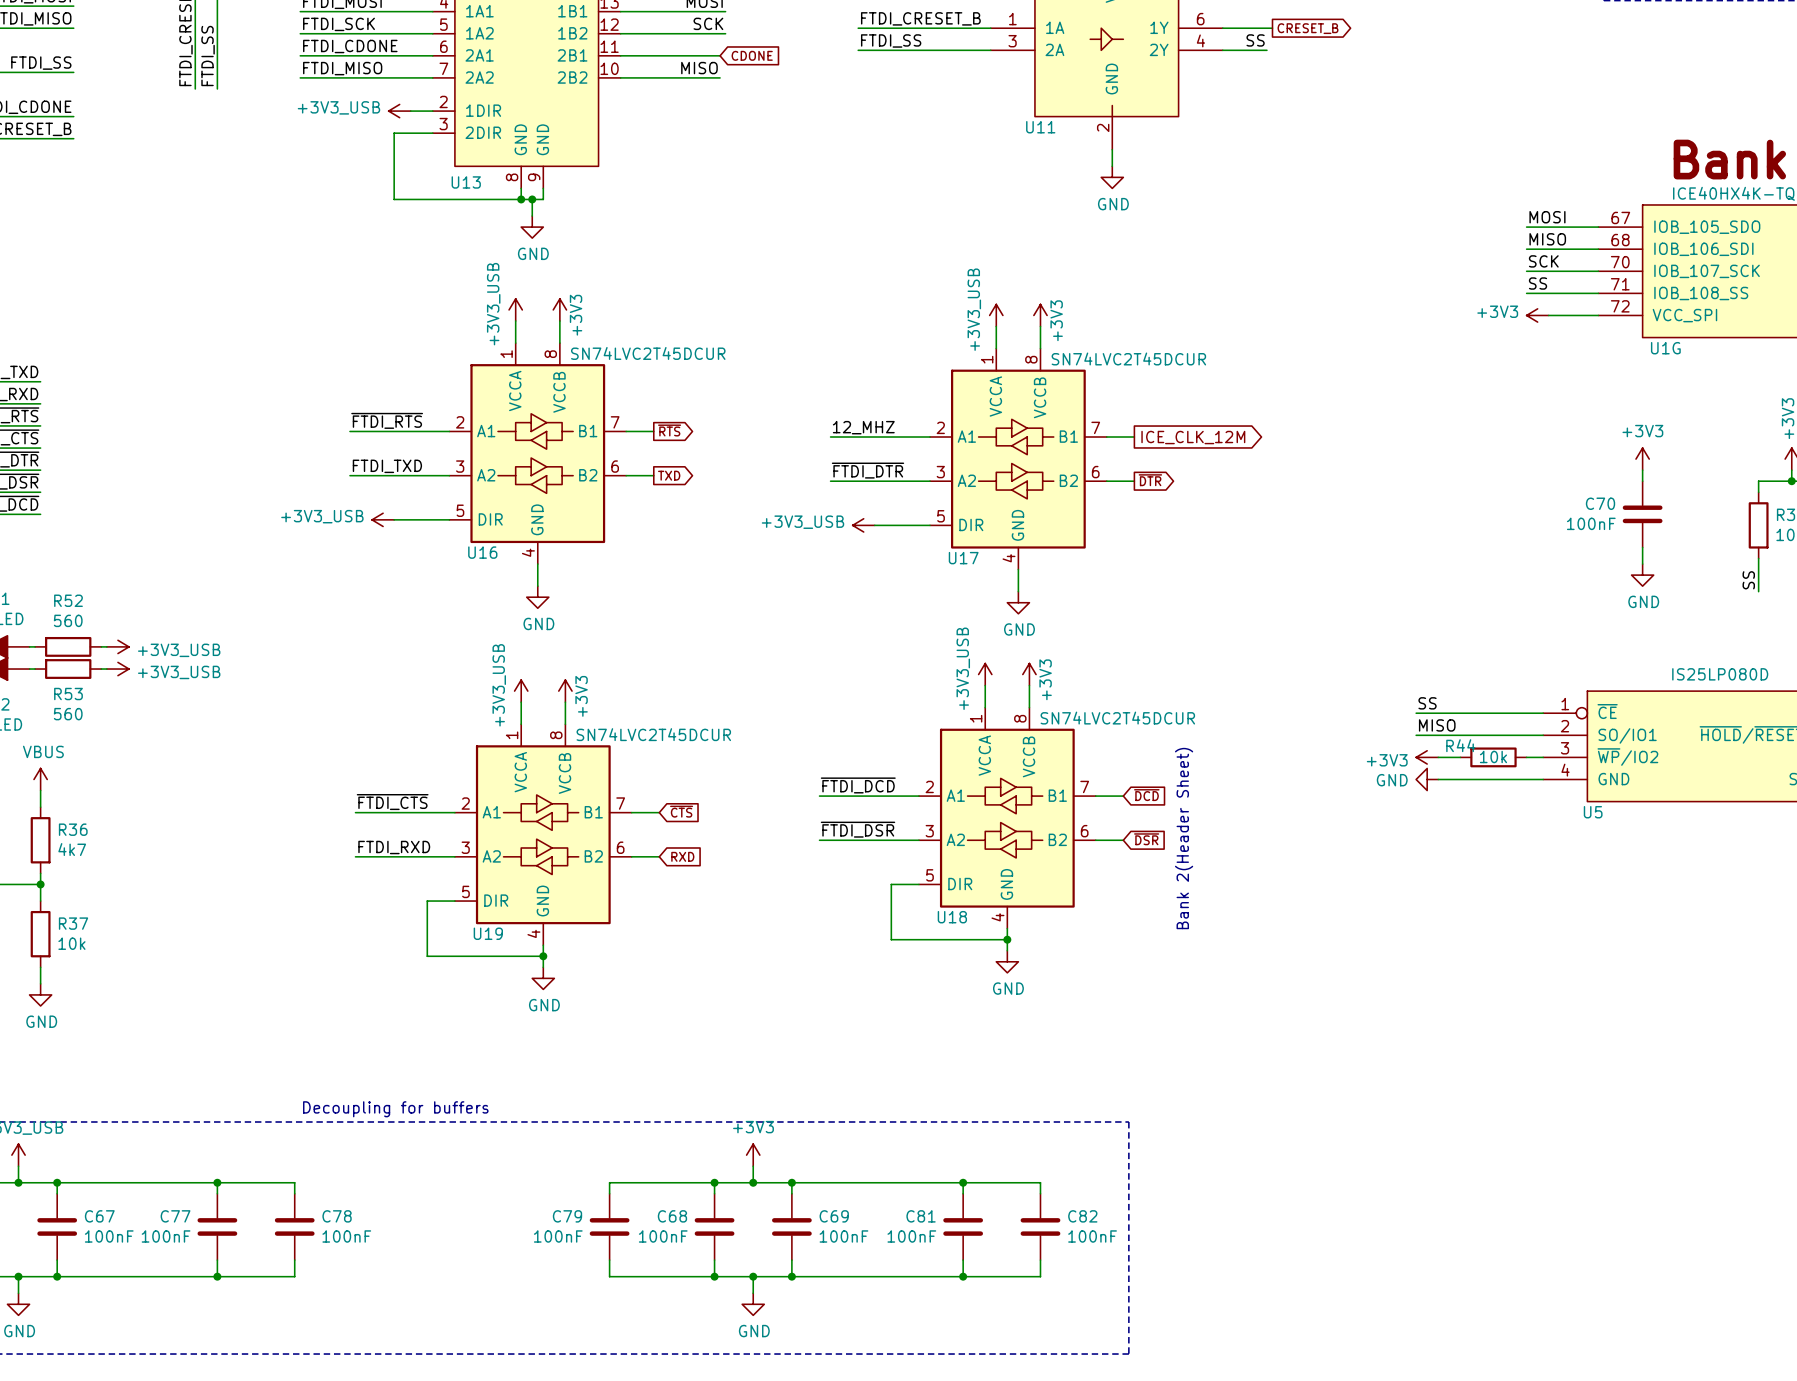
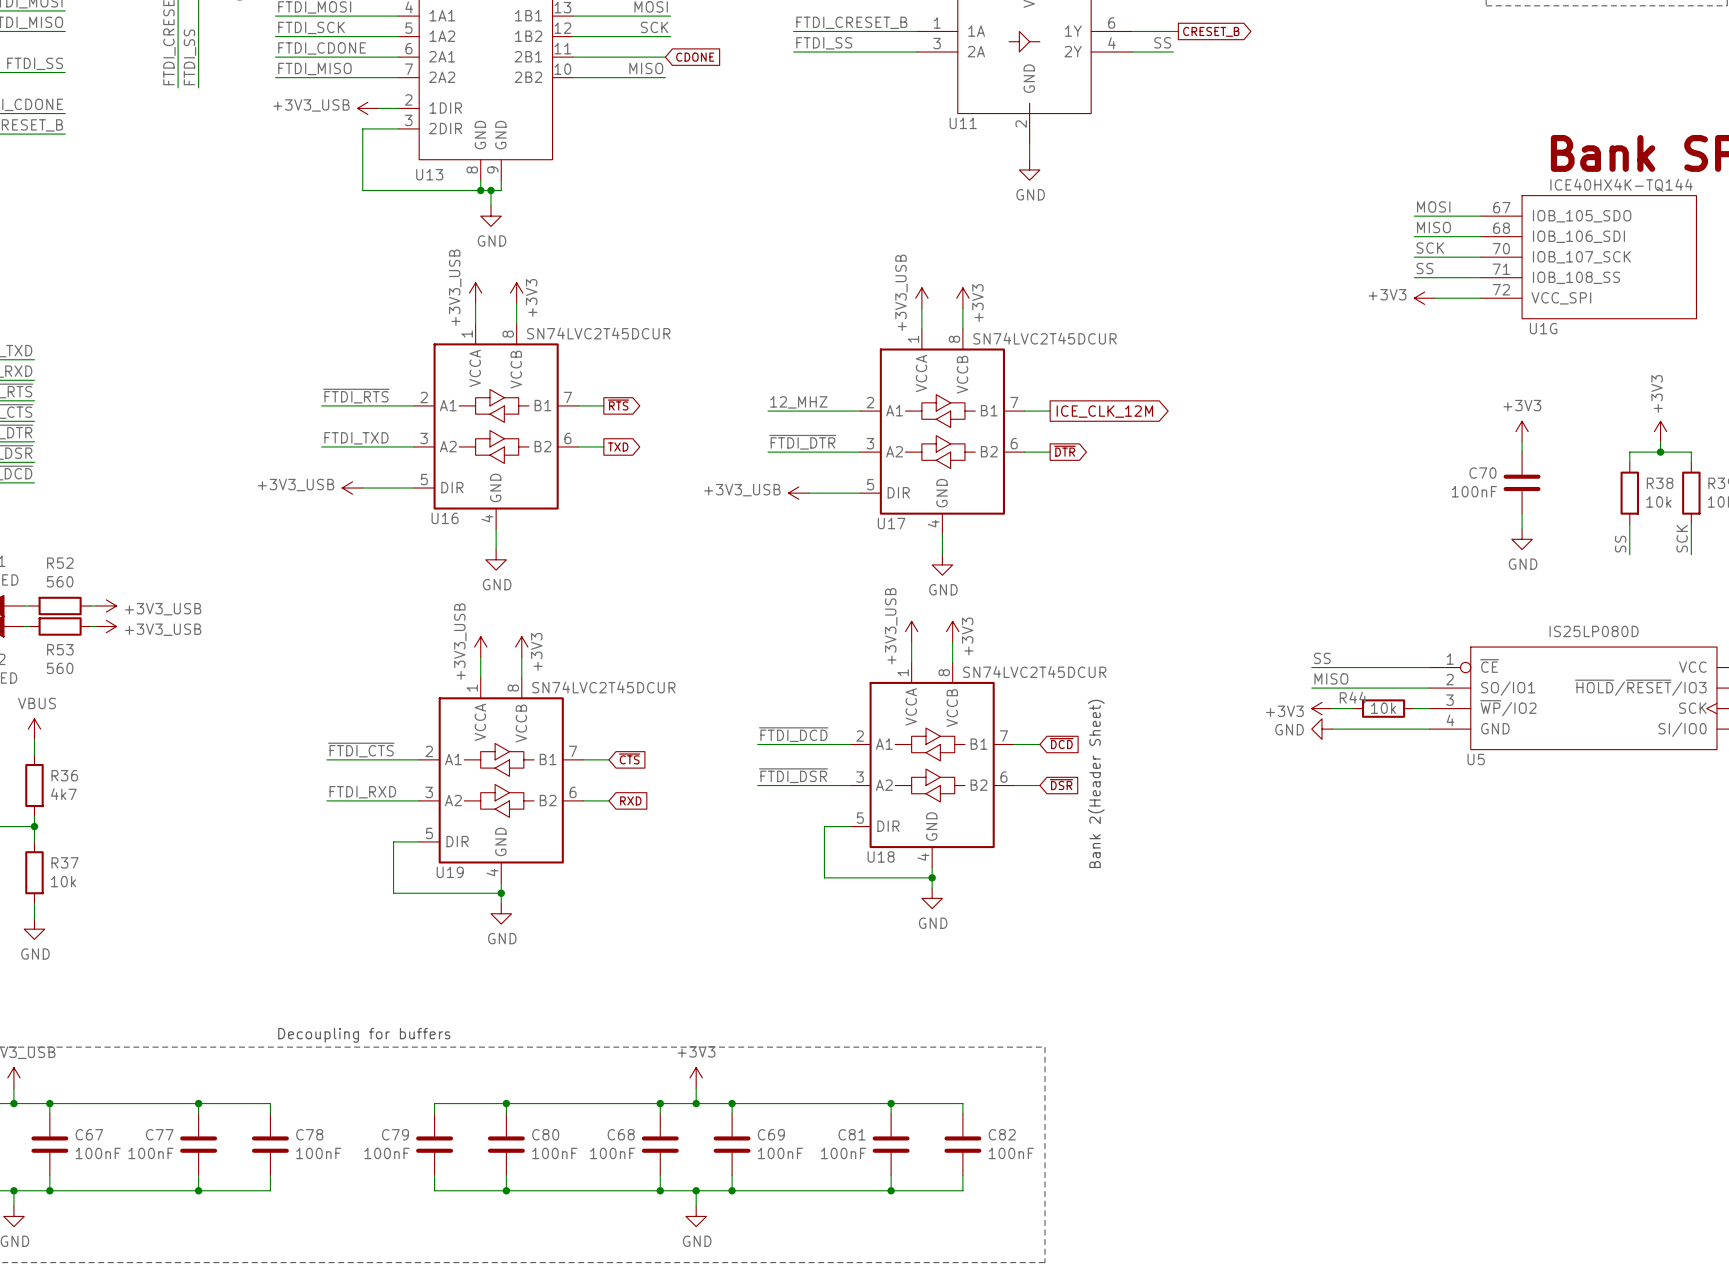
wire: none -> (506, 1103) (506, 1113)
junction: none -> (506, 1103)
wire: (609, 1182) (609, 1193) -> (562, 1103) (434, 1103) (434, 1113)
C80: none -> 100nF (506, 1144)
C79 position: (609, 1226) -> (434, 1144)
wire: none -> (506, 1175) (506, 1190)
wire: (609, 1260) (609, 1276) -> (434, 1175) (434, 1190) (562, 1190)
junction: none -> (506, 1190)

